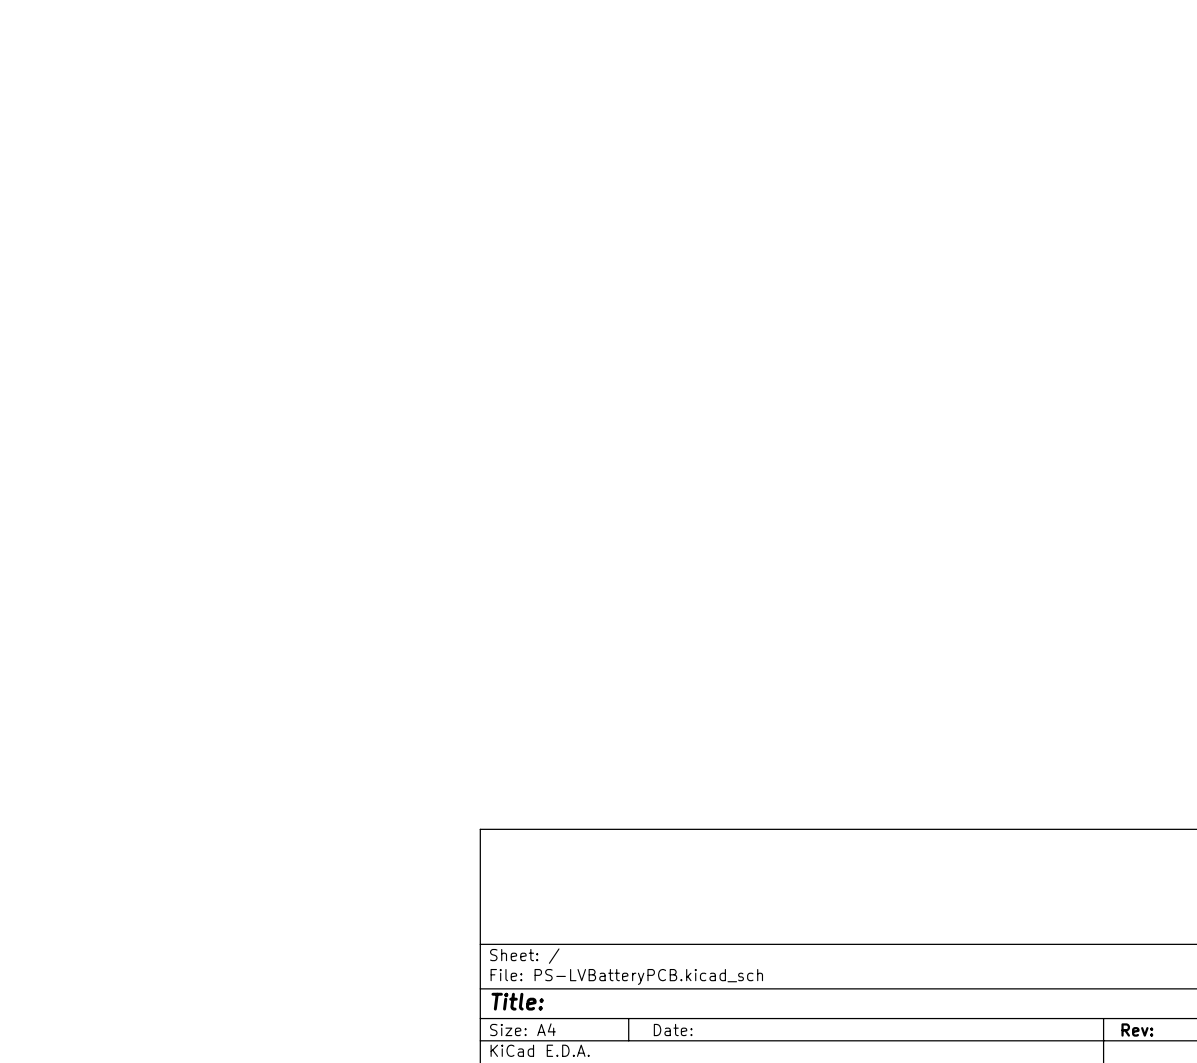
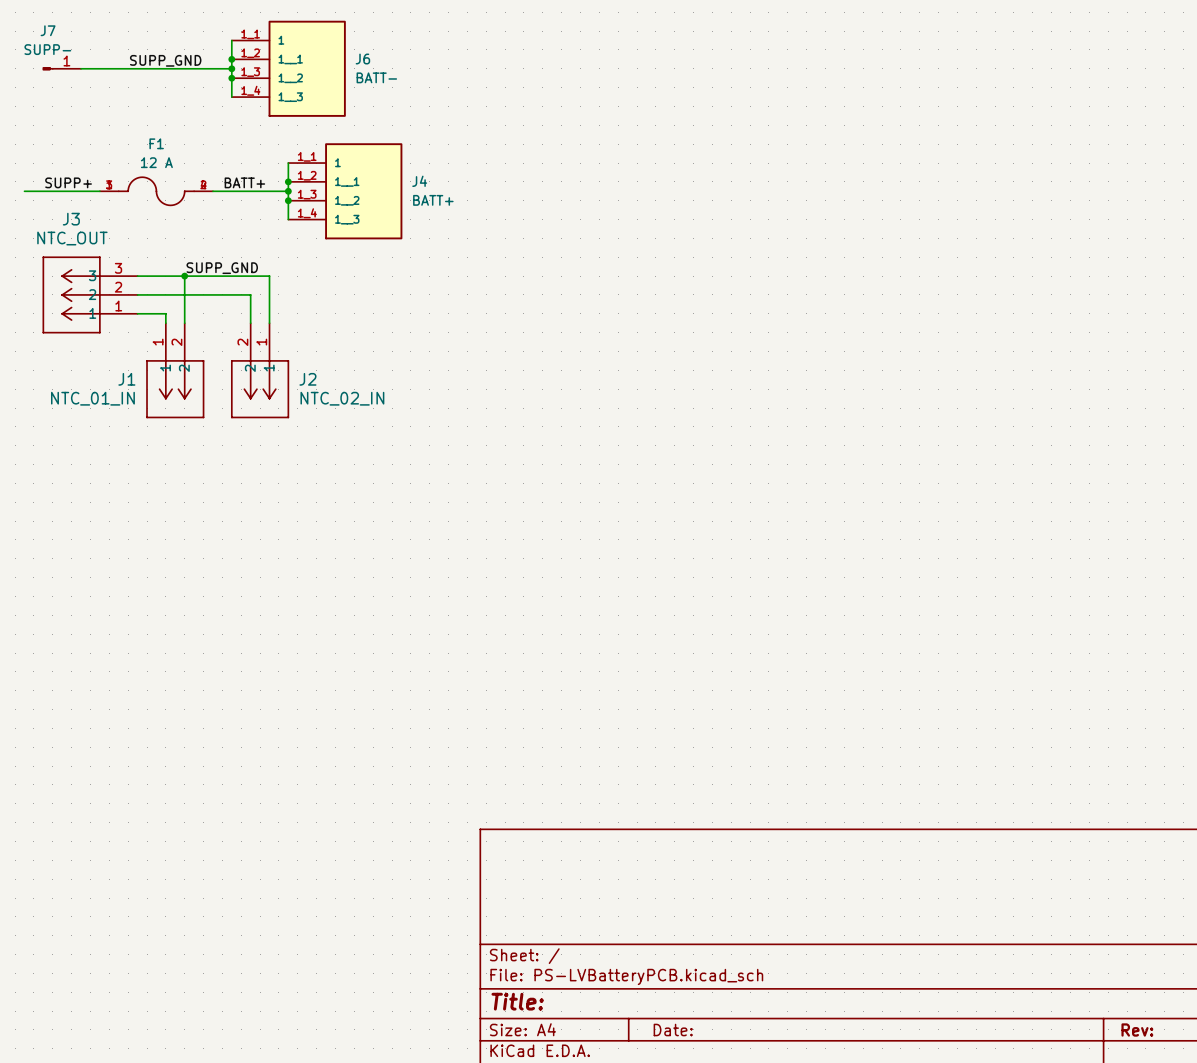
wire: none -> (231, 40) (231, 97)
junction: none -> (231, 59)
label: none -> SUPP_GND (165, 60)
J7: none -> SUPP- (61, 68)
wire: none -> (81, 68) (231, 68)
junction: none -> (231, 68)
J6: none -> BATT- (288, 68)
junction: none -> (231, 78)
wire: none -> (288, 163) (288, 219)
junction: none -> (288, 181)
label: none -> SUPP+ (68, 182)
label: none -> BATT+ (244, 182)
wire: none -> (24, 191) (99, 191)
F1: none -> 12 A (156, 191)
wire: none -> (212, 191) (288, 191)
junction: none -> (288, 191)
J4: none -> BATT+ (345, 191)
junction: none -> (288, 200)
label: none -> SUPP_GND (222, 268)
wire: none -> (137, 276) (269, 276) (269, 323)
wire: none -> (184, 276) (184, 323)
junction: none -> (184, 276)
J3: none -> NTC_OUT (90, 294)
wire: none -> (137, 294) (250, 294) (250, 323)
wire: none -> (137, 313) (165, 313) (165, 323)
J1: none -> NTC_01_IN (175, 370)
J2: none -> NTC_02_IN (260, 370)

